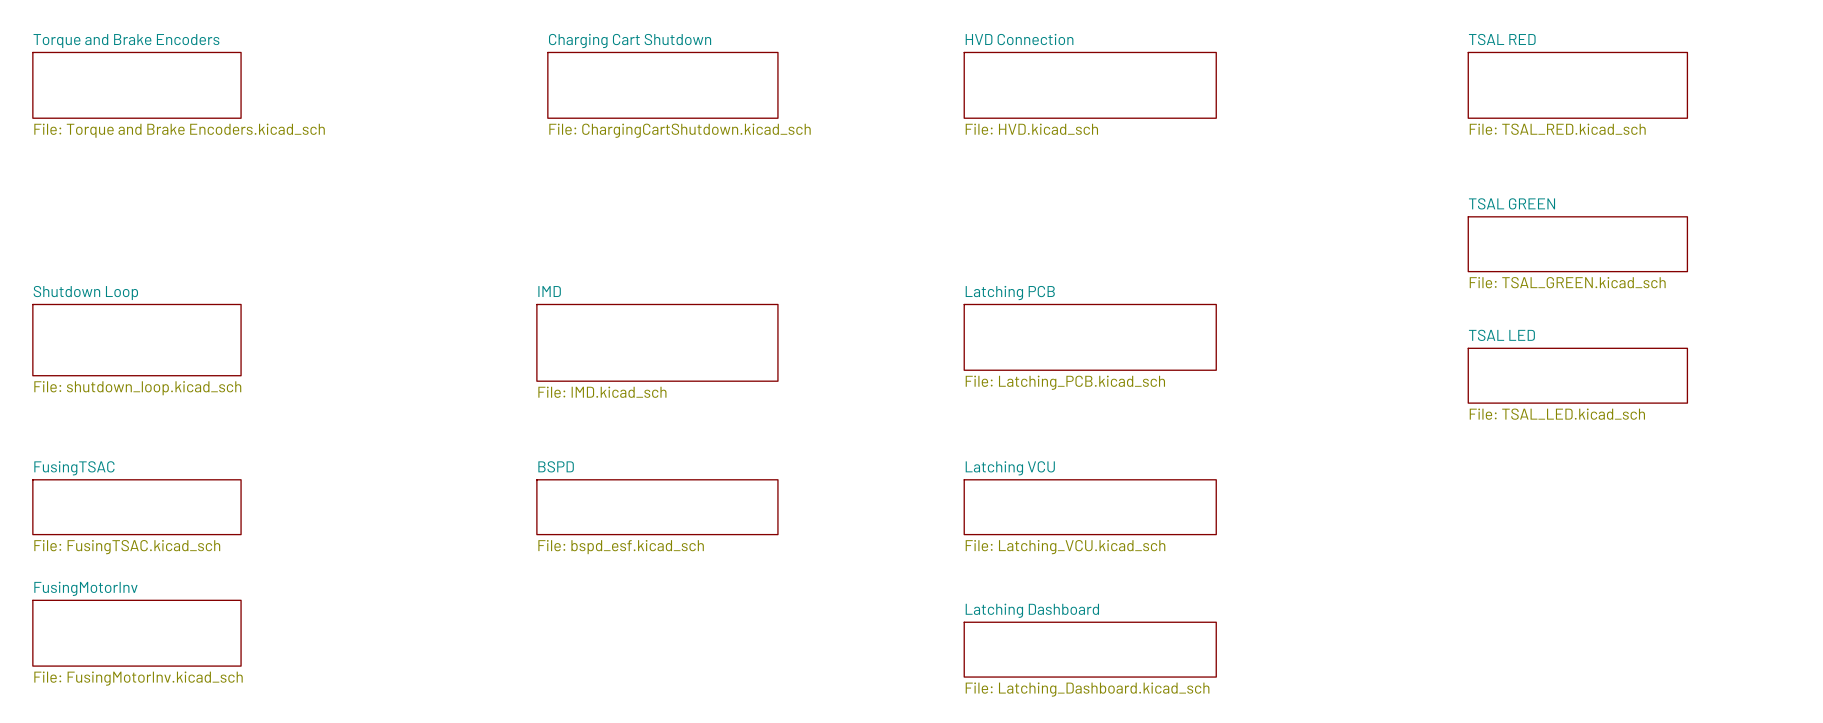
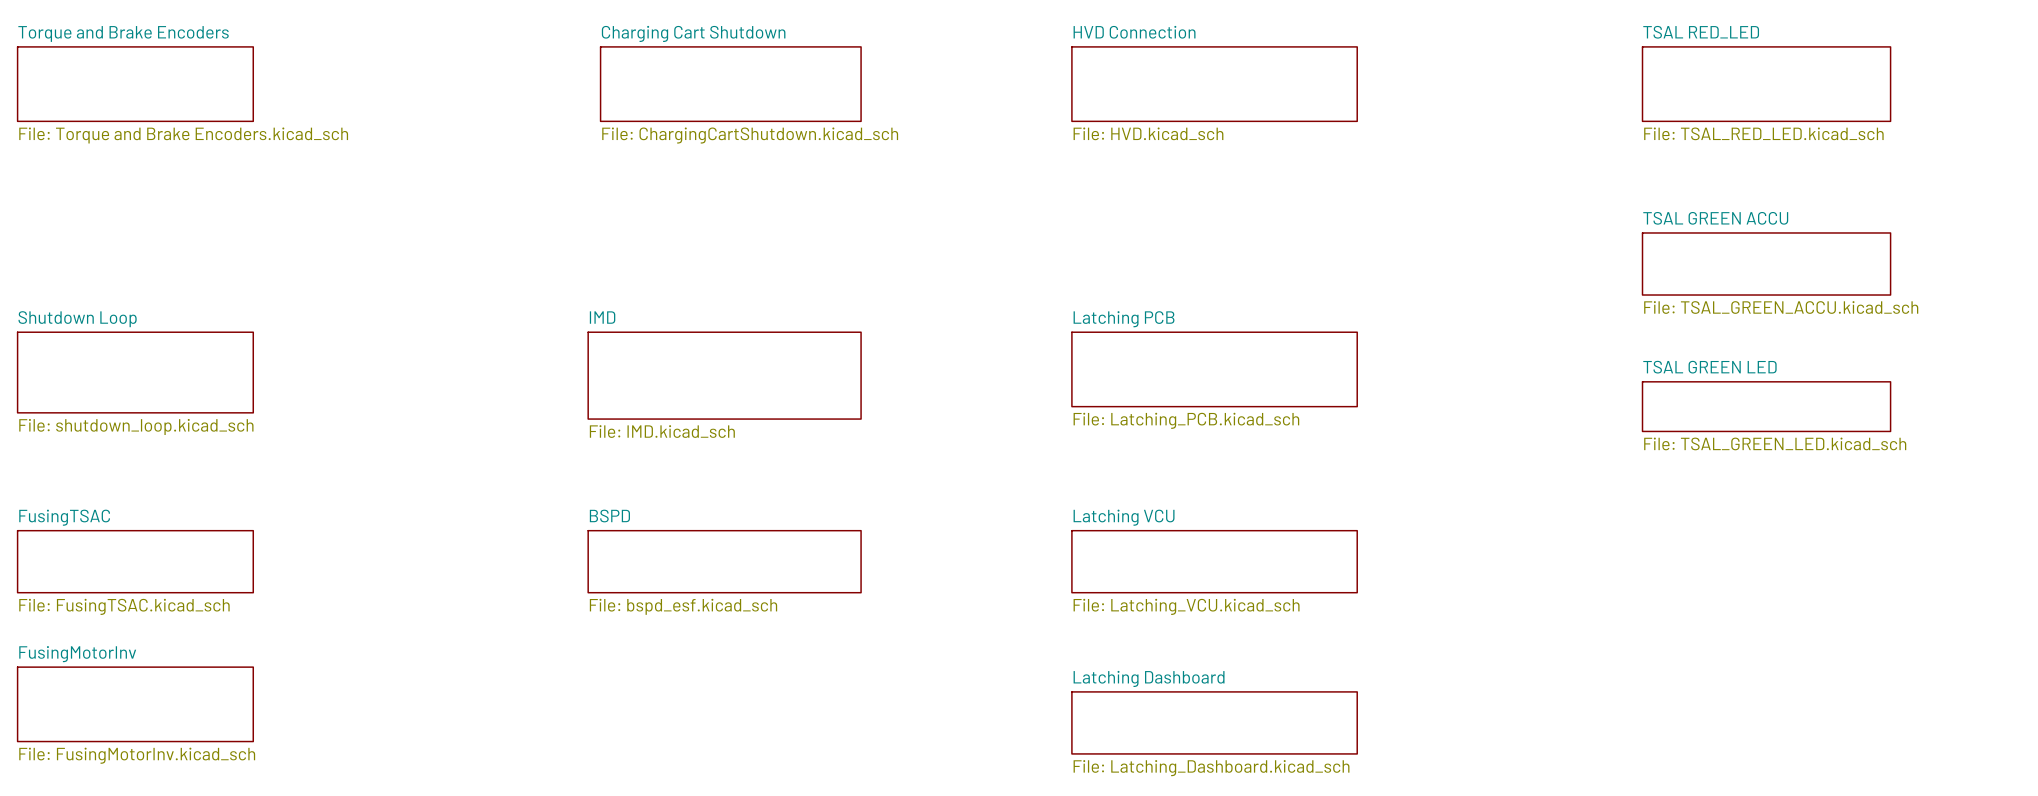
sheet TSAL RED name: TSAL RED (1502, 39) -> TSAL RED_LED (1701, 32)
sheet TSAL RED value: File: TSAL_RED.kicad_sch (1557, 129) -> File: TSAL_RED_LED.kicad_sch (1763, 133)
sheet TSAL GREEN name: TSAL GREEN (1512, 203) -> TSAL GREEN ACCU (1715, 218)
sheet TSAL GREEN value: File: TSAL_GREEN.kicad_sch (1567, 282) -> File: TSAL_GREEN_ACCU.kicad_sch (1781, 307)
sheet TSAL GREEN LED: none -> File: TSAL_GREEN_LED.kicad_sch (1766, 406)
sheet TSAL LED: File: TSAL_LED.kicad_sch (1577, 375) -> none

